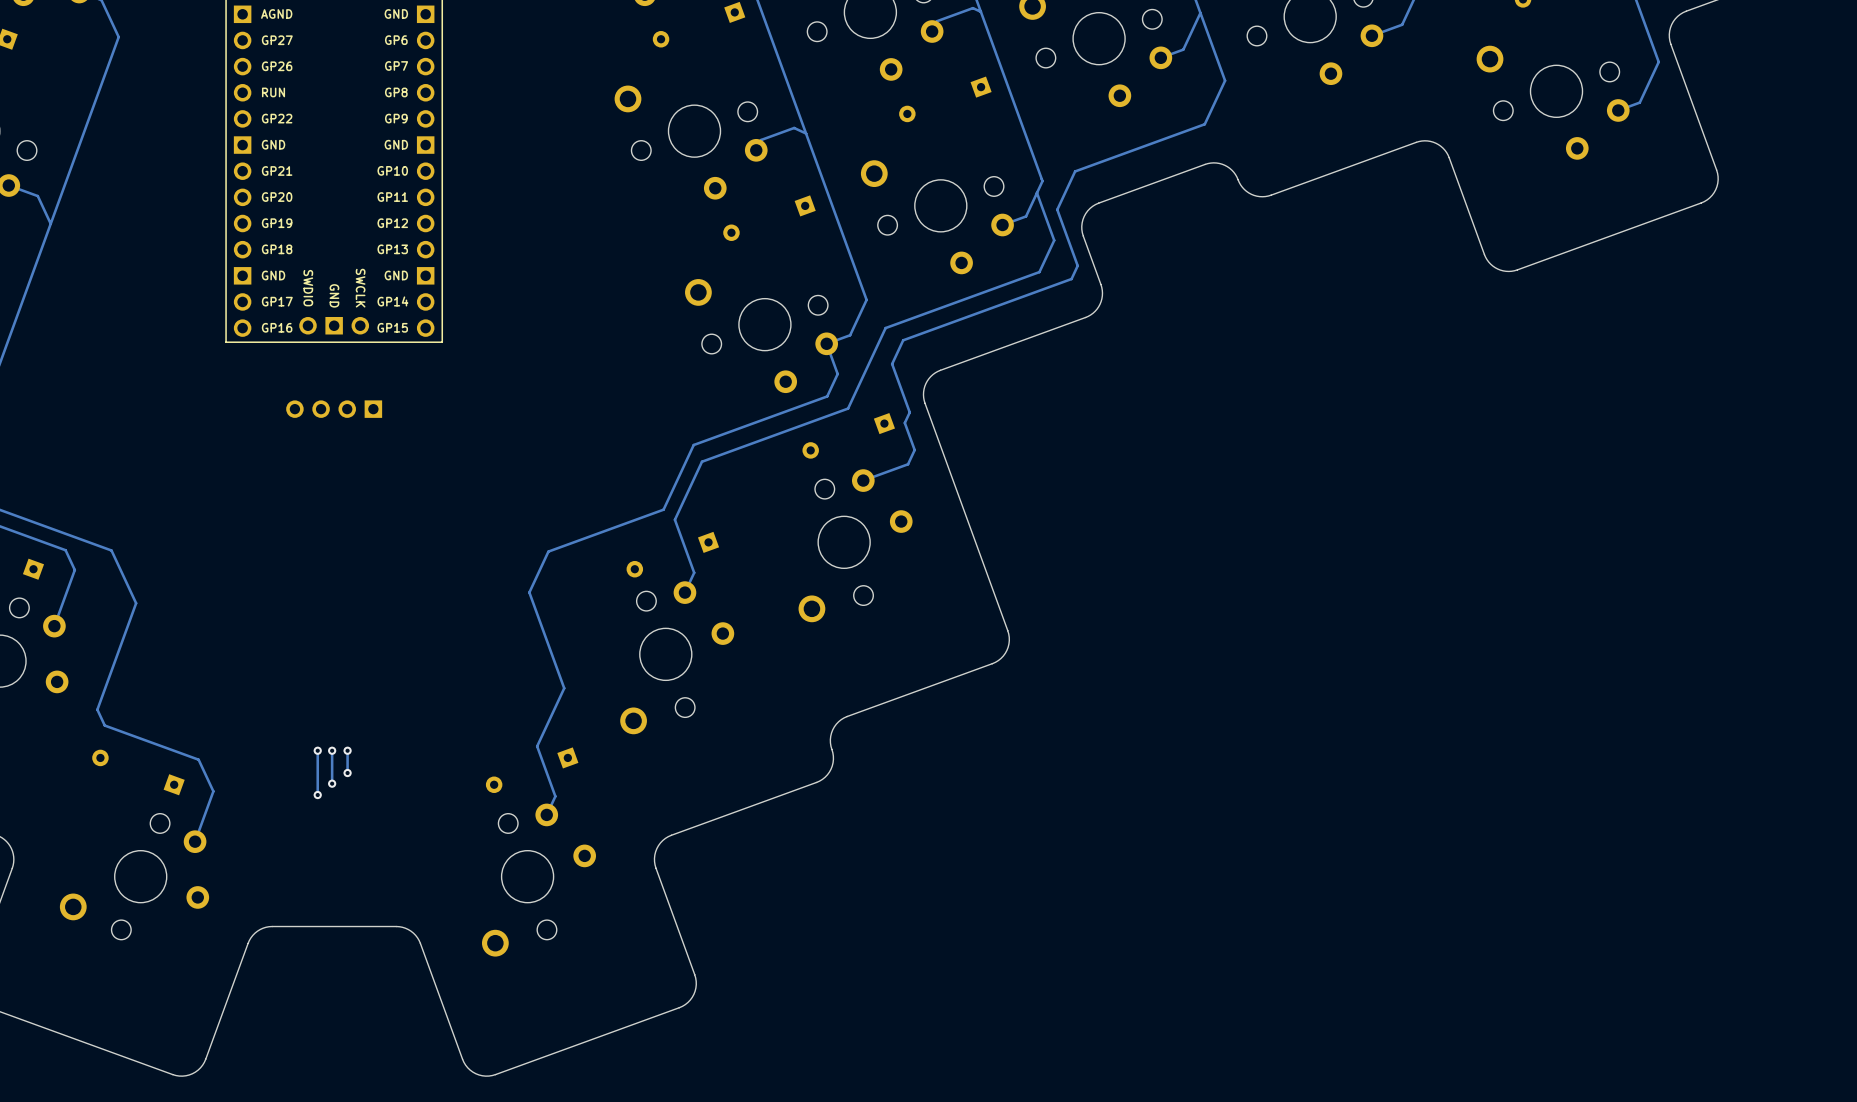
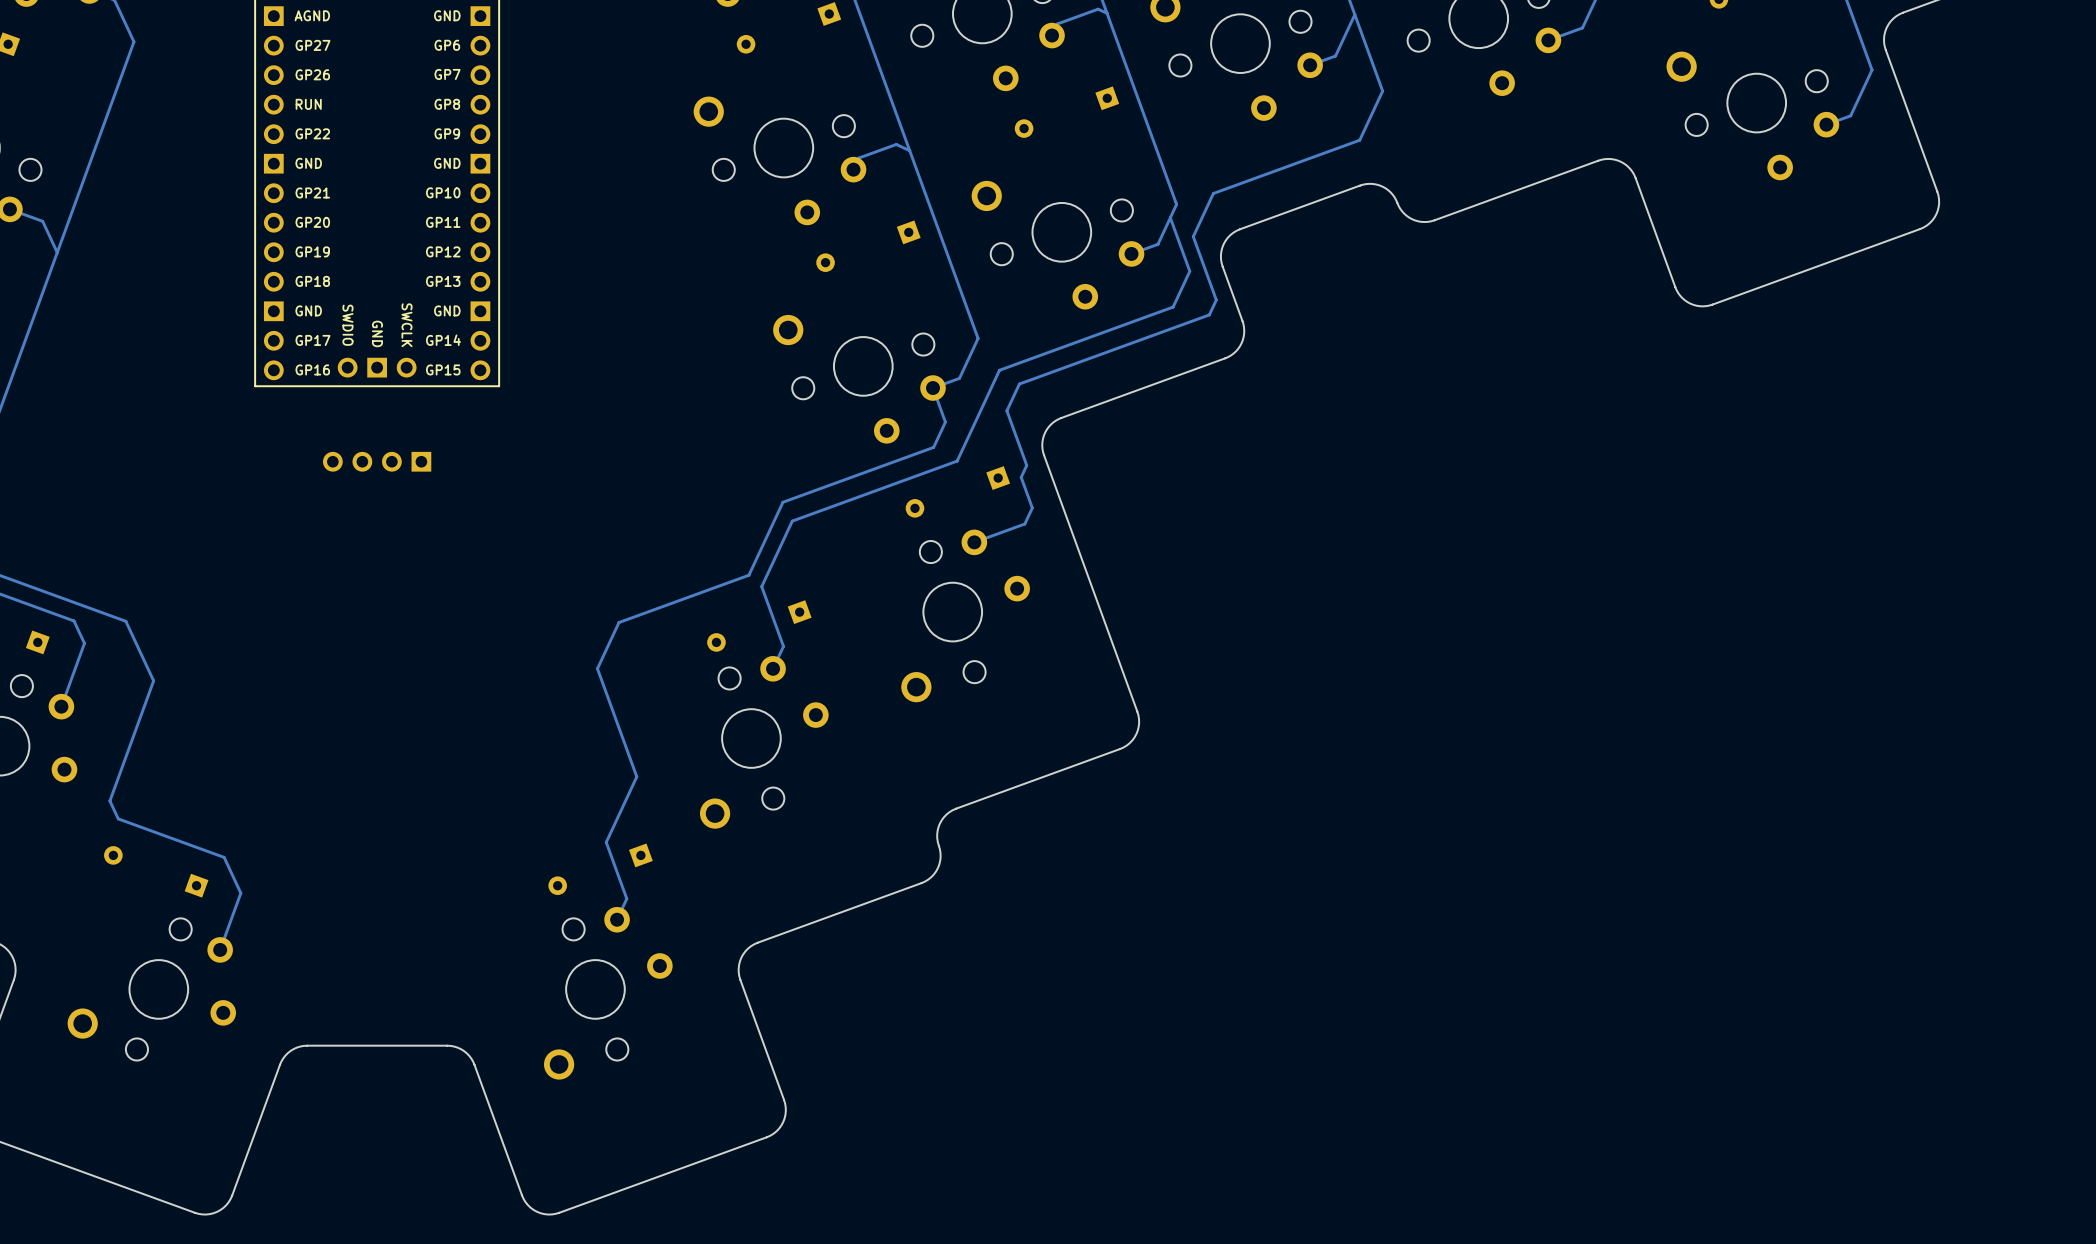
track: (317, 750) (317, 795) -> none
via: (317, 750) -> none
track: (332, 750) (332, 783) -> none
via: (332, 750) -> none
track: (347, 750) (347, 773) -> none
via: (347, 750) -> none
via: (347, 773) -> none
via: (332, 783) -> none
via: (317, 795) -> none

